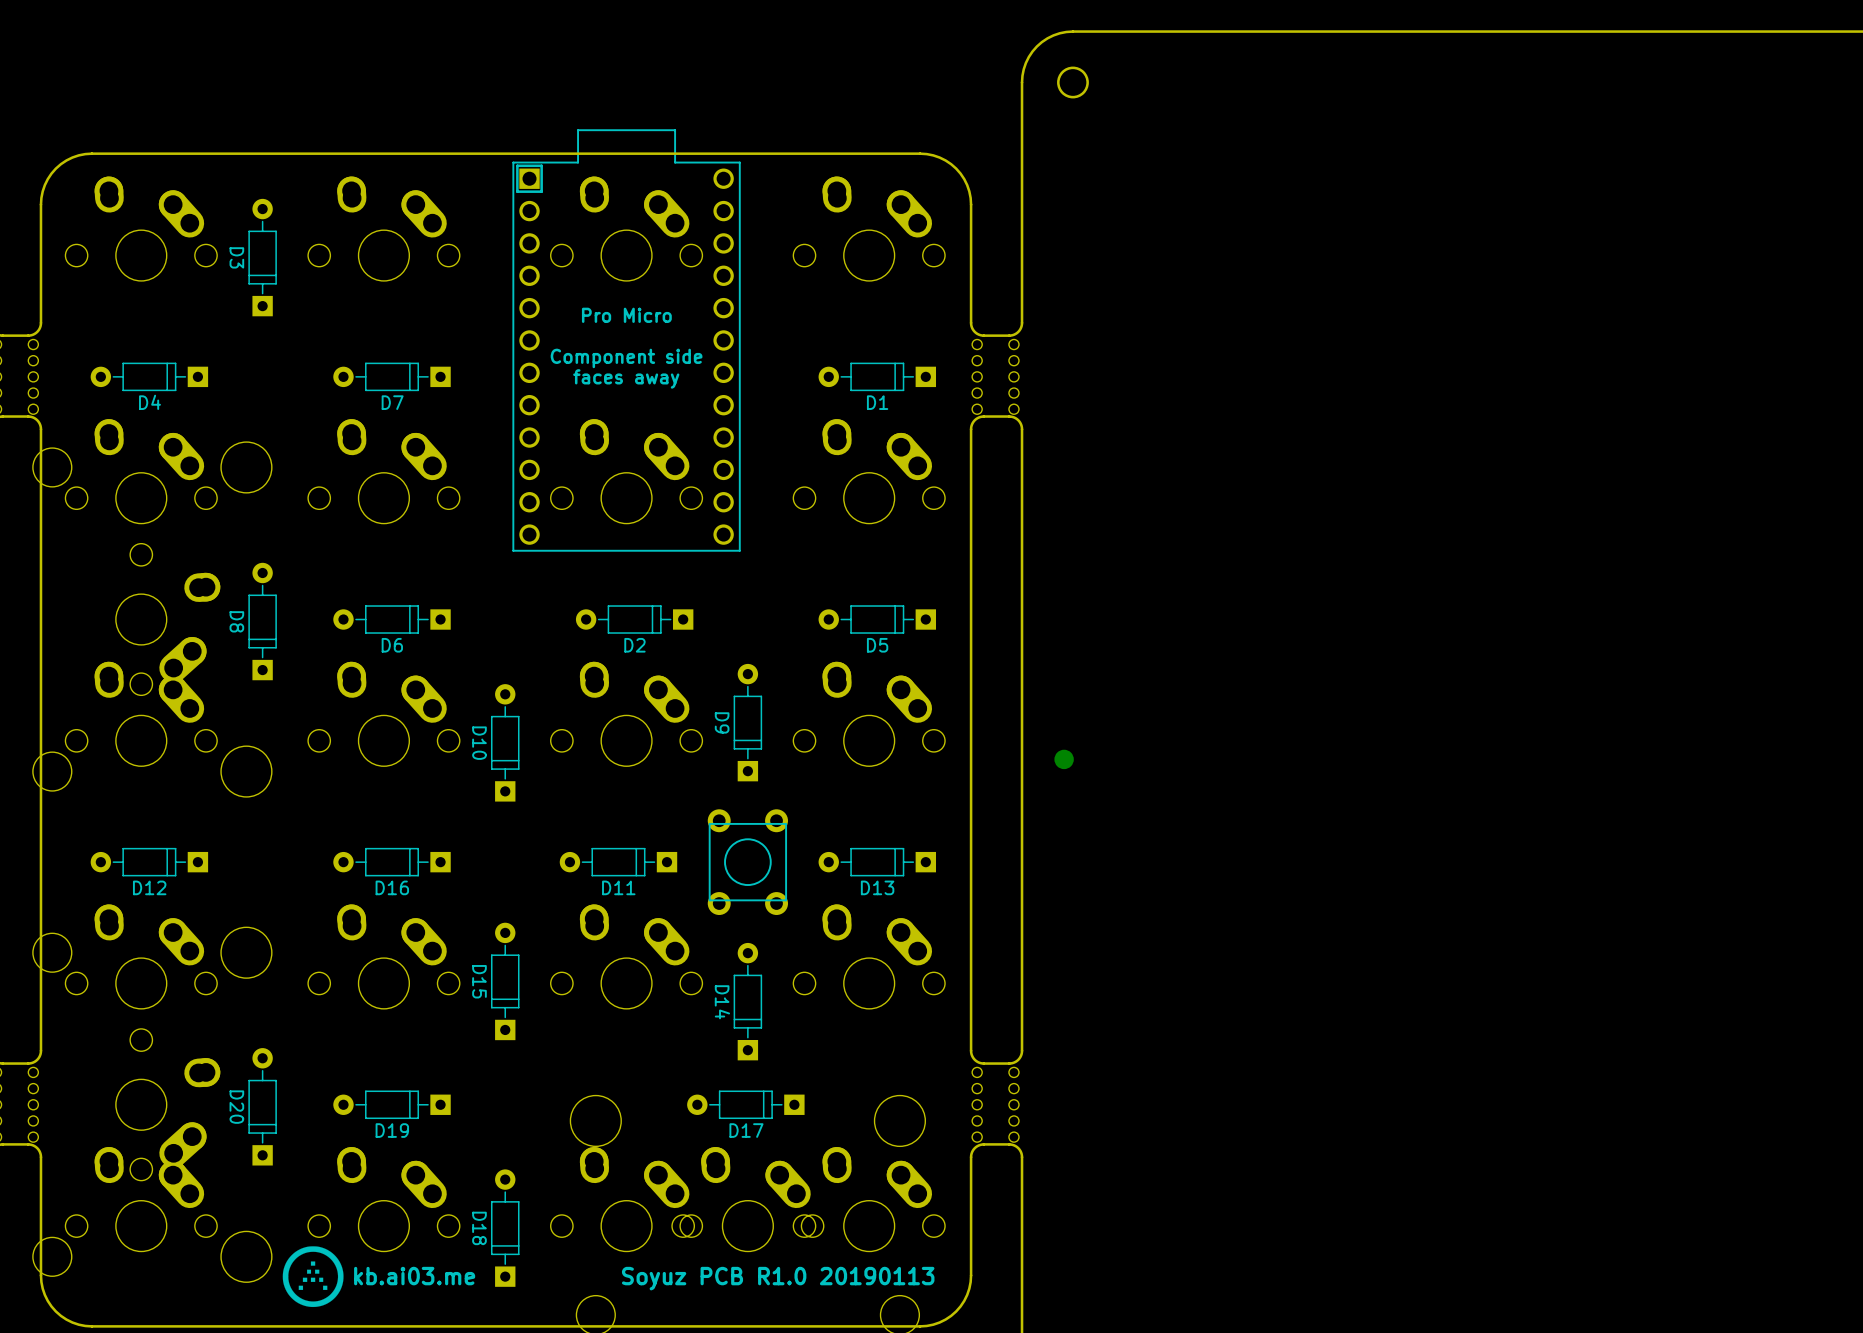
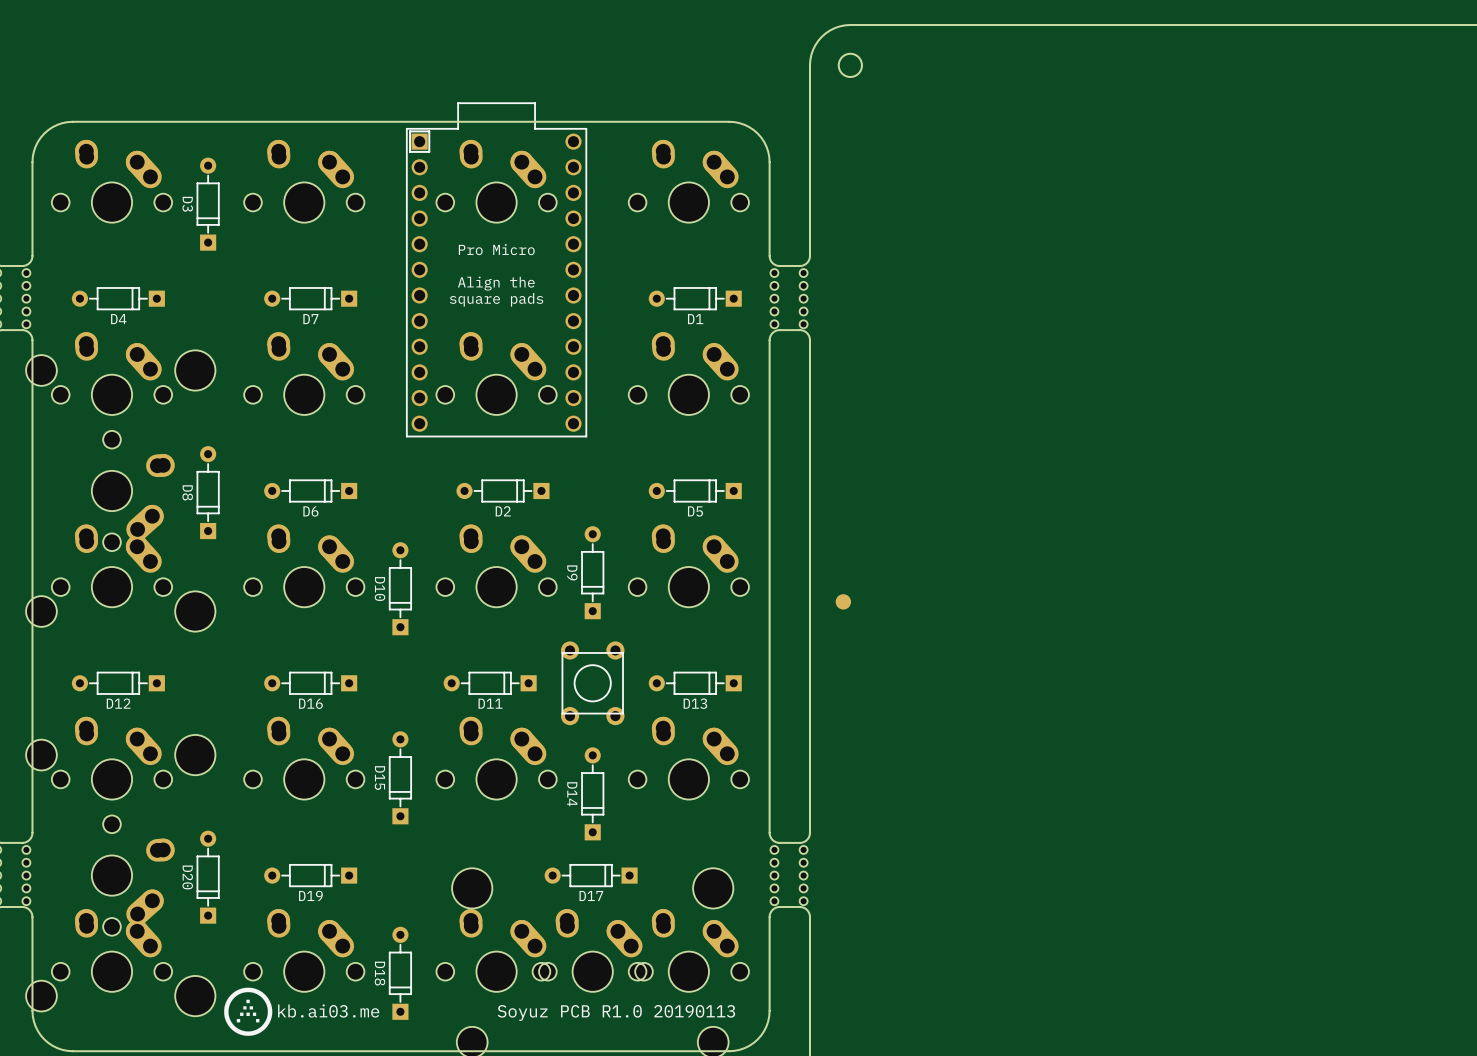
text: Component side (626, 358) -> Align the (496, 283)
text: faces away (626, 378) -> square pads (496, 299)

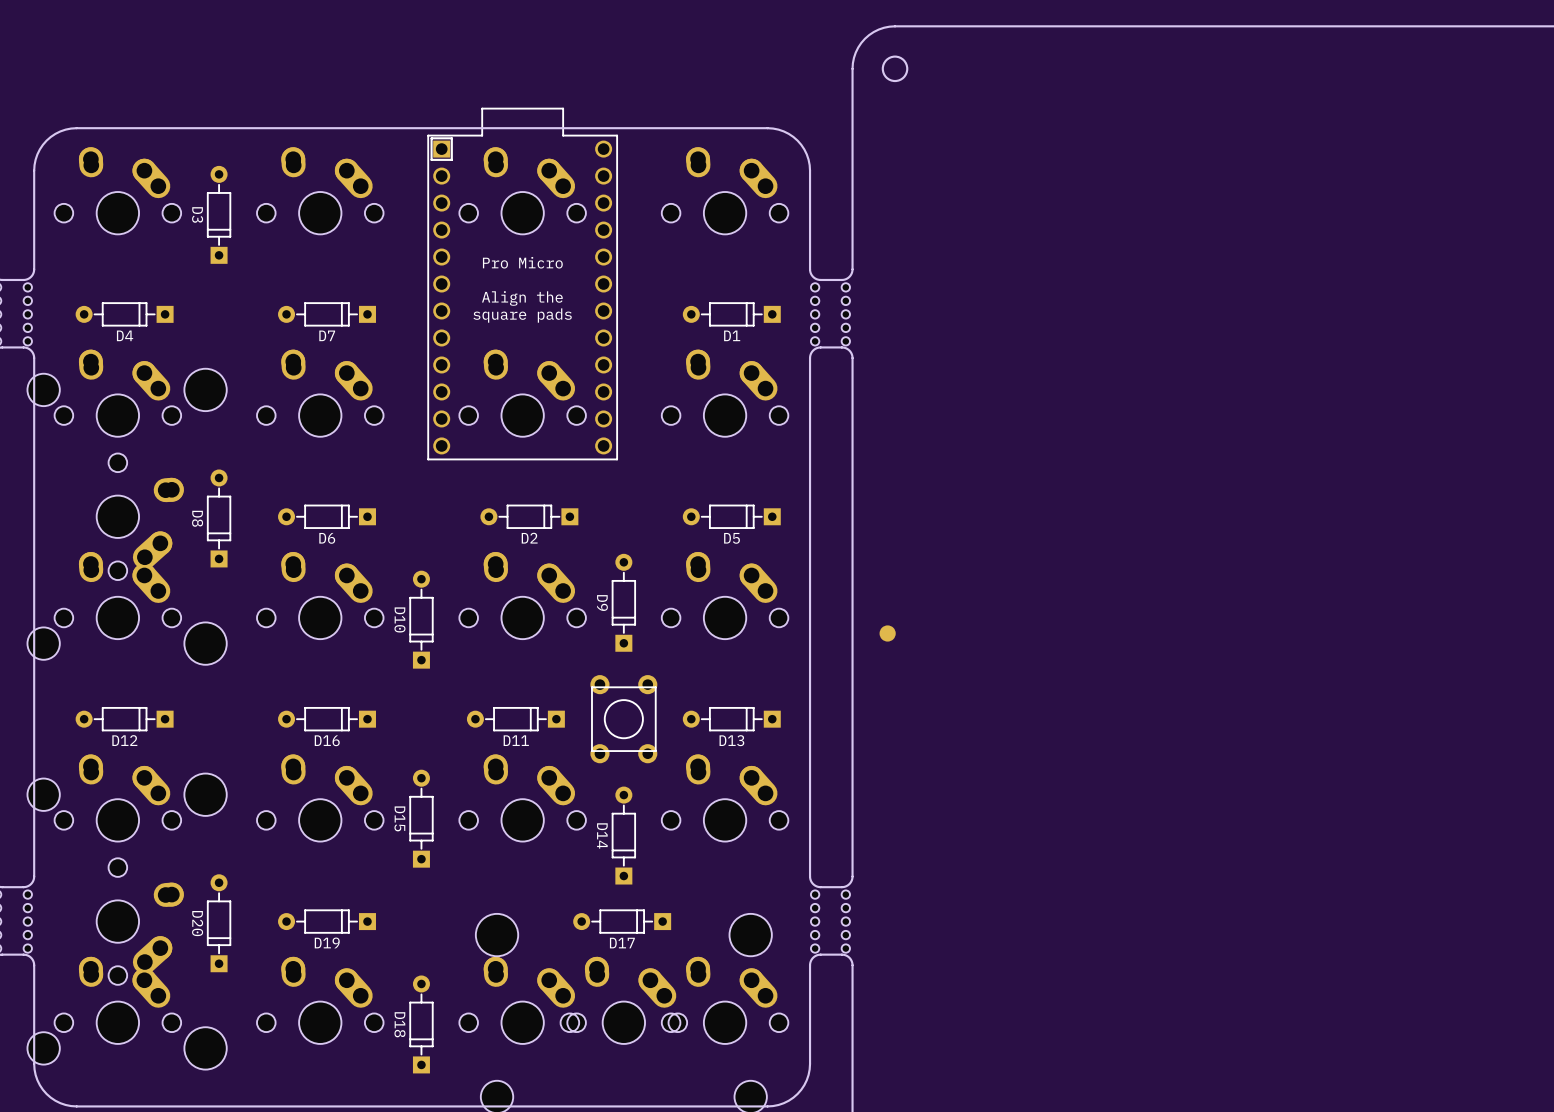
drawing: [224, 987, 273, 1036] -> none
text: kb.ai03.me (328, 1011) -> none
text: Soyuz PCB R1.0 20190113 (616, 1012) -> none

